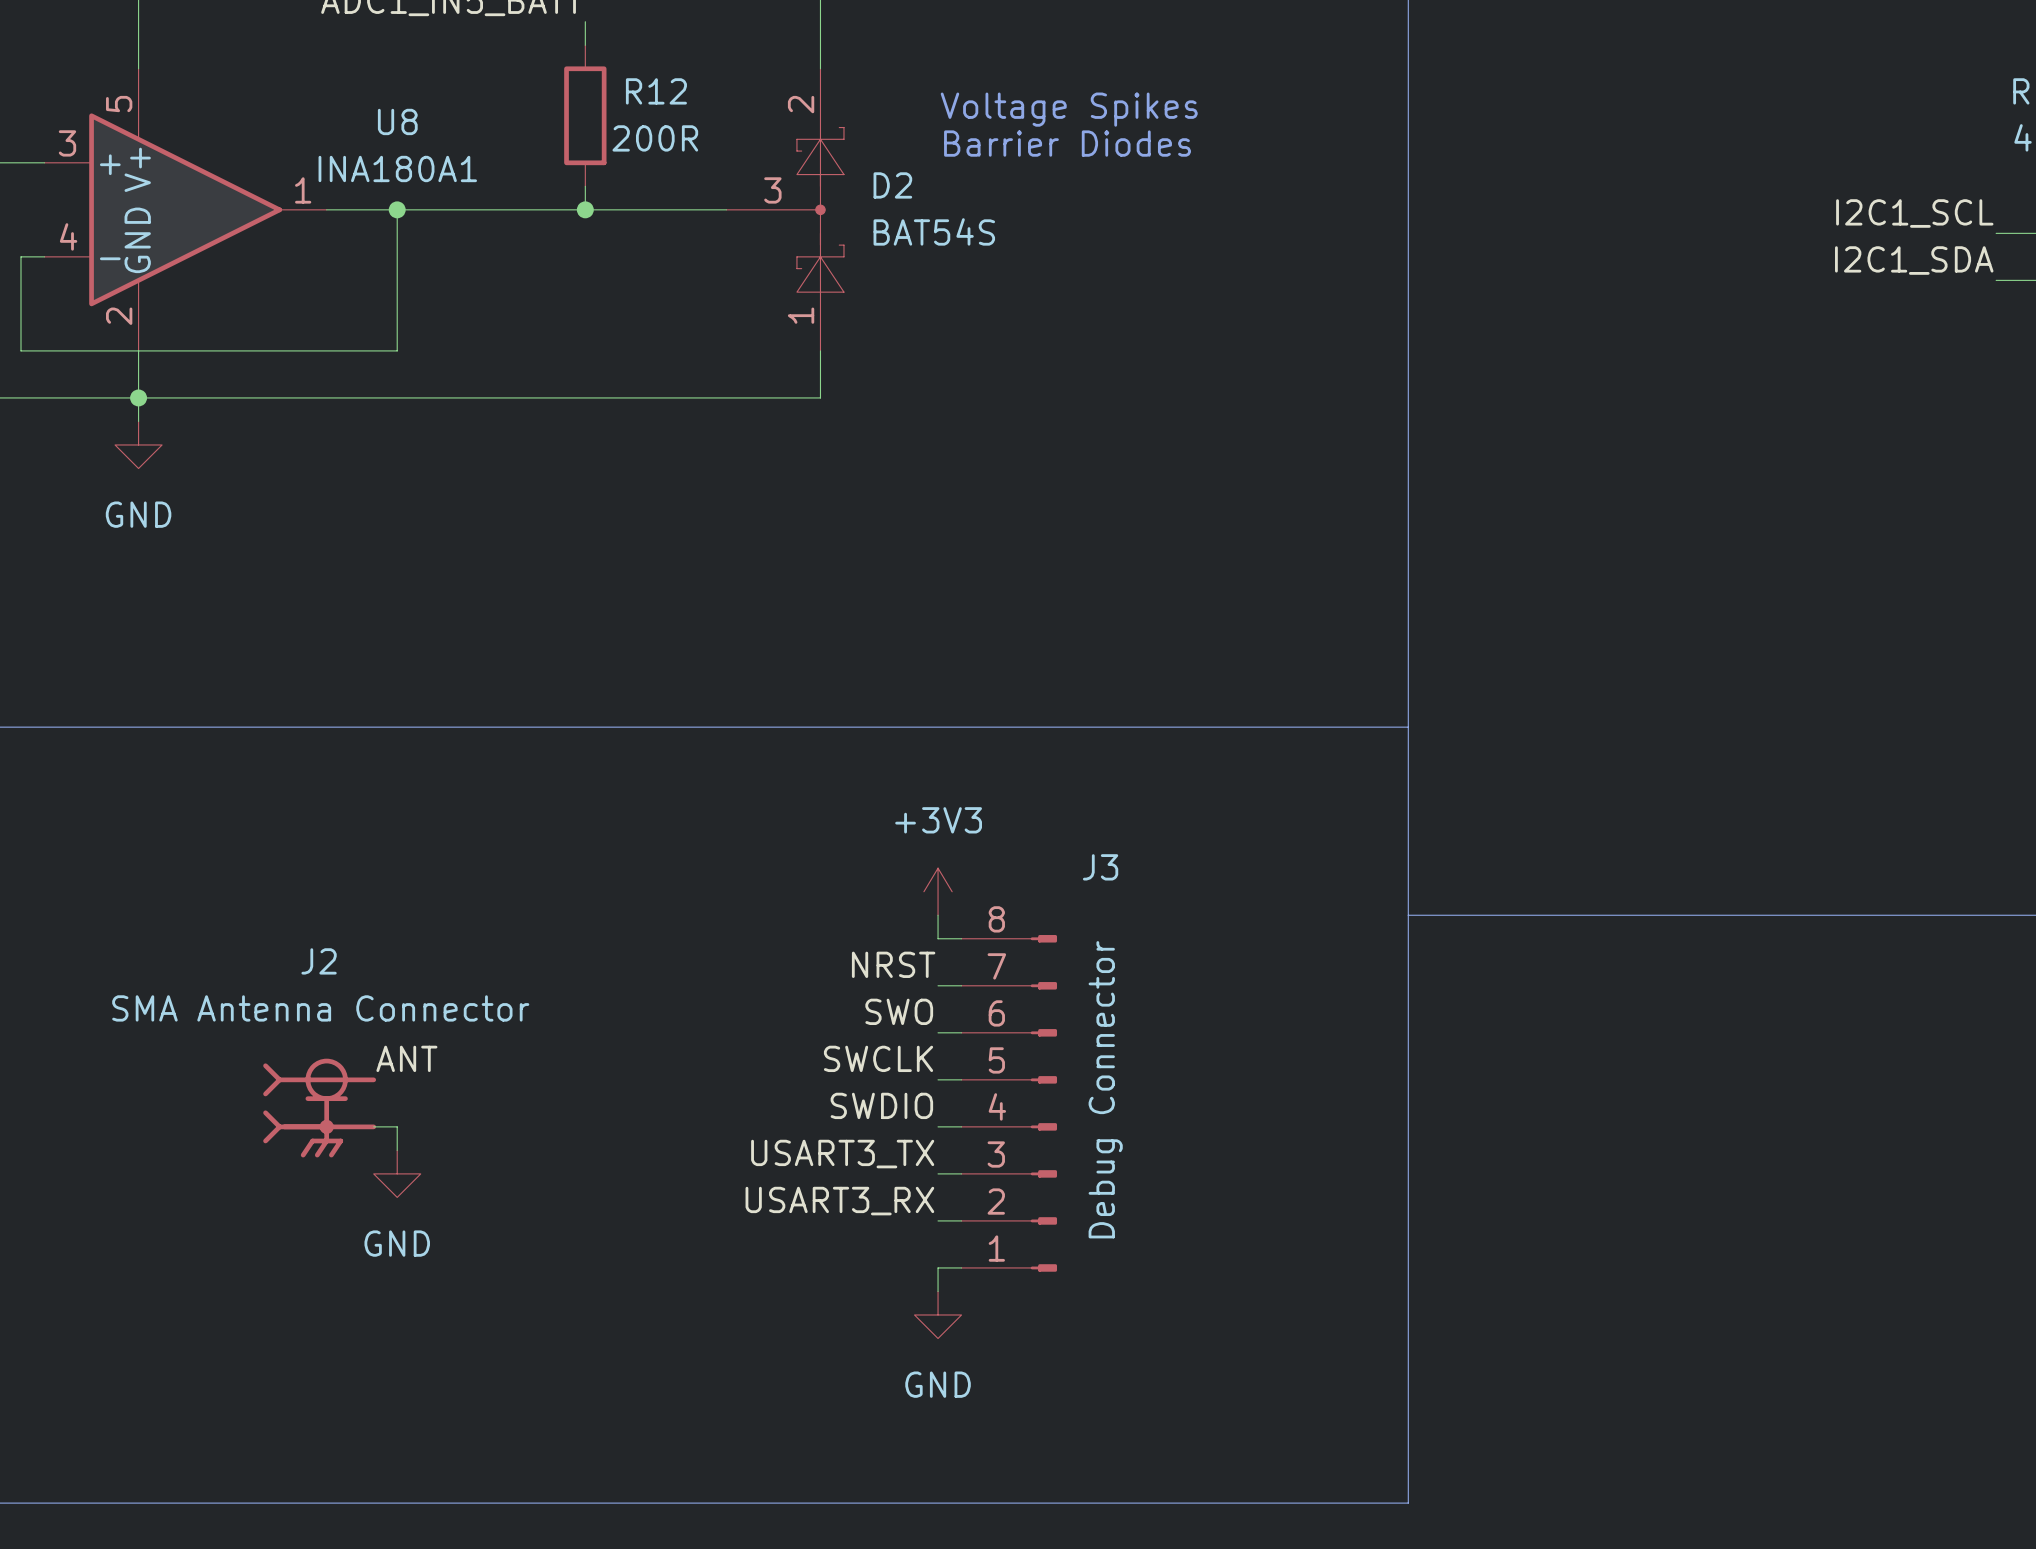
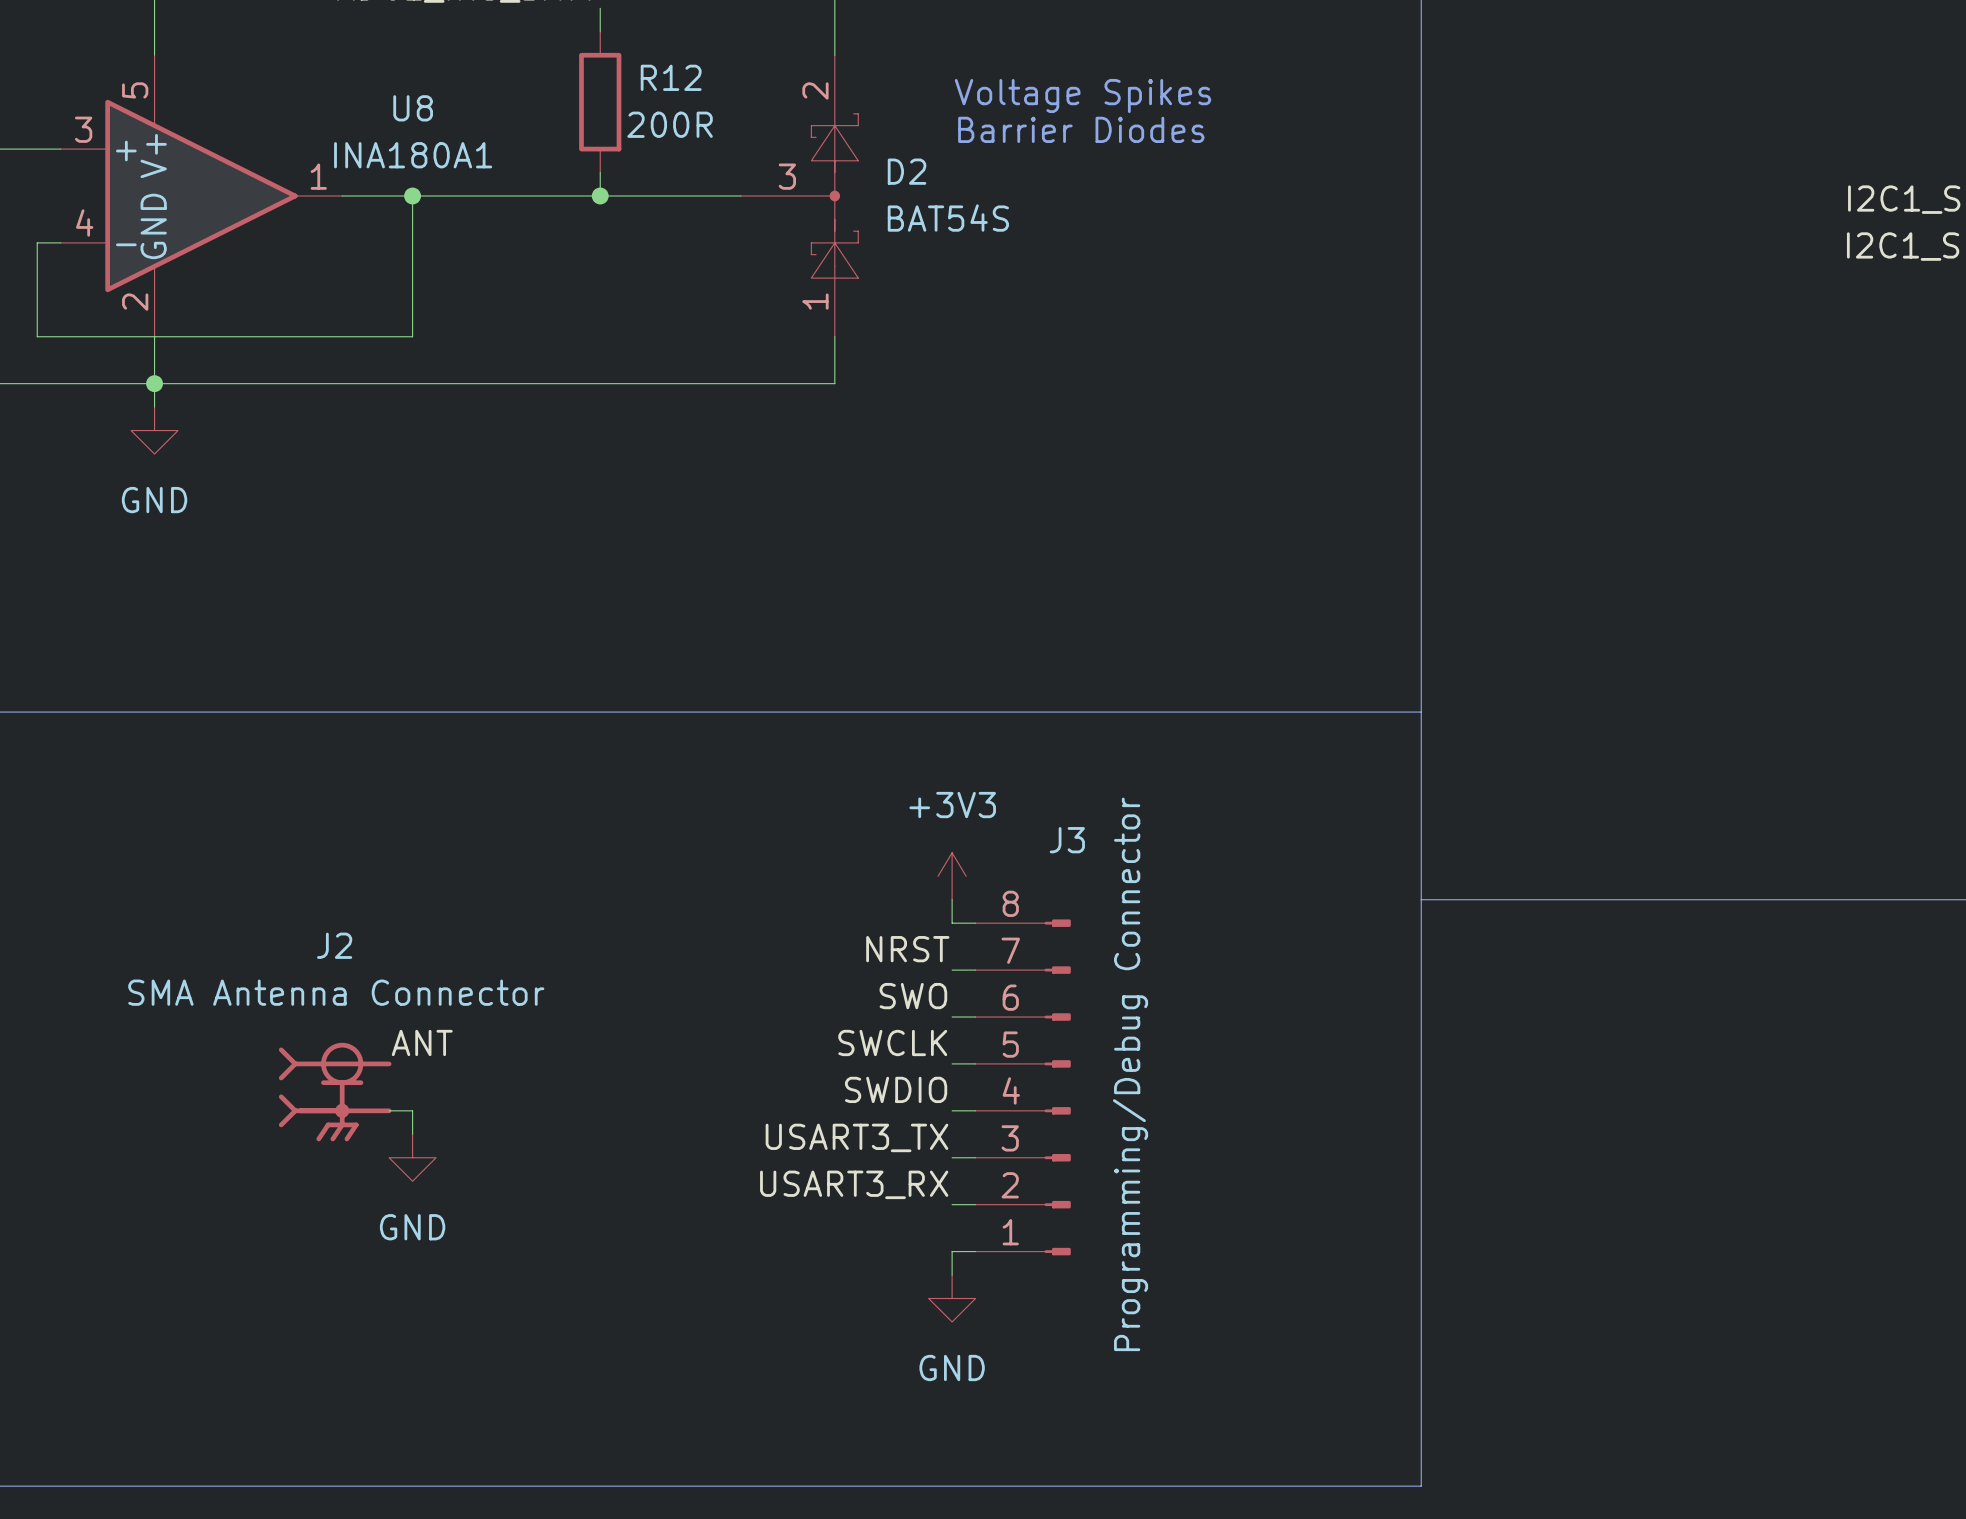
J3 name position: J3 (1100, 867) -> J3 (1067, 840)
J3 value: Debug Connector (1105, 1089) -> Programming/Debug Connector (1130, 1074)

